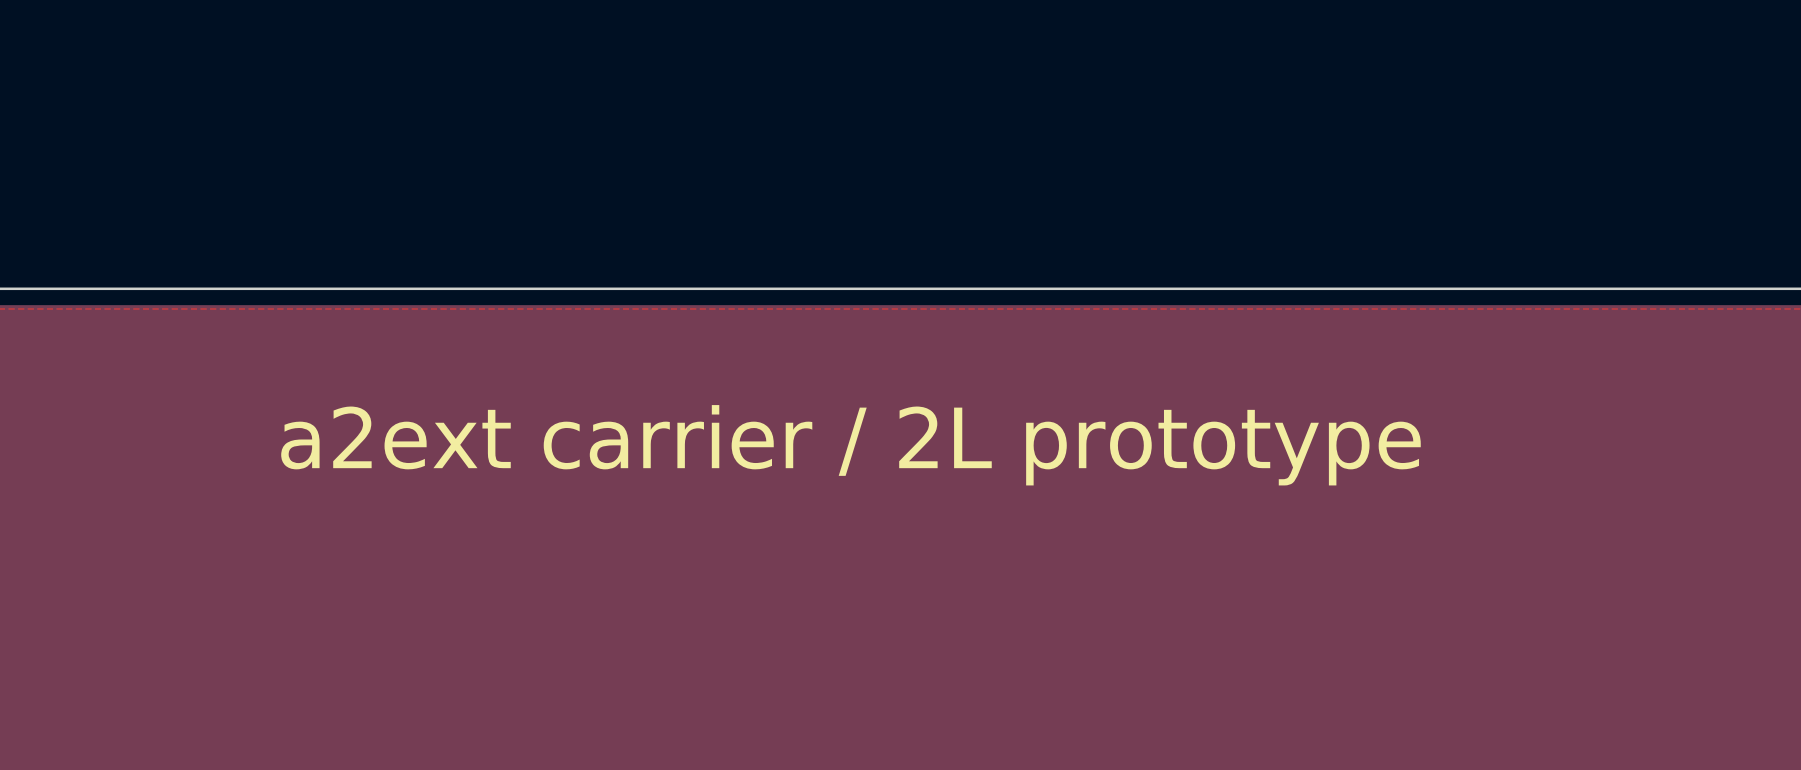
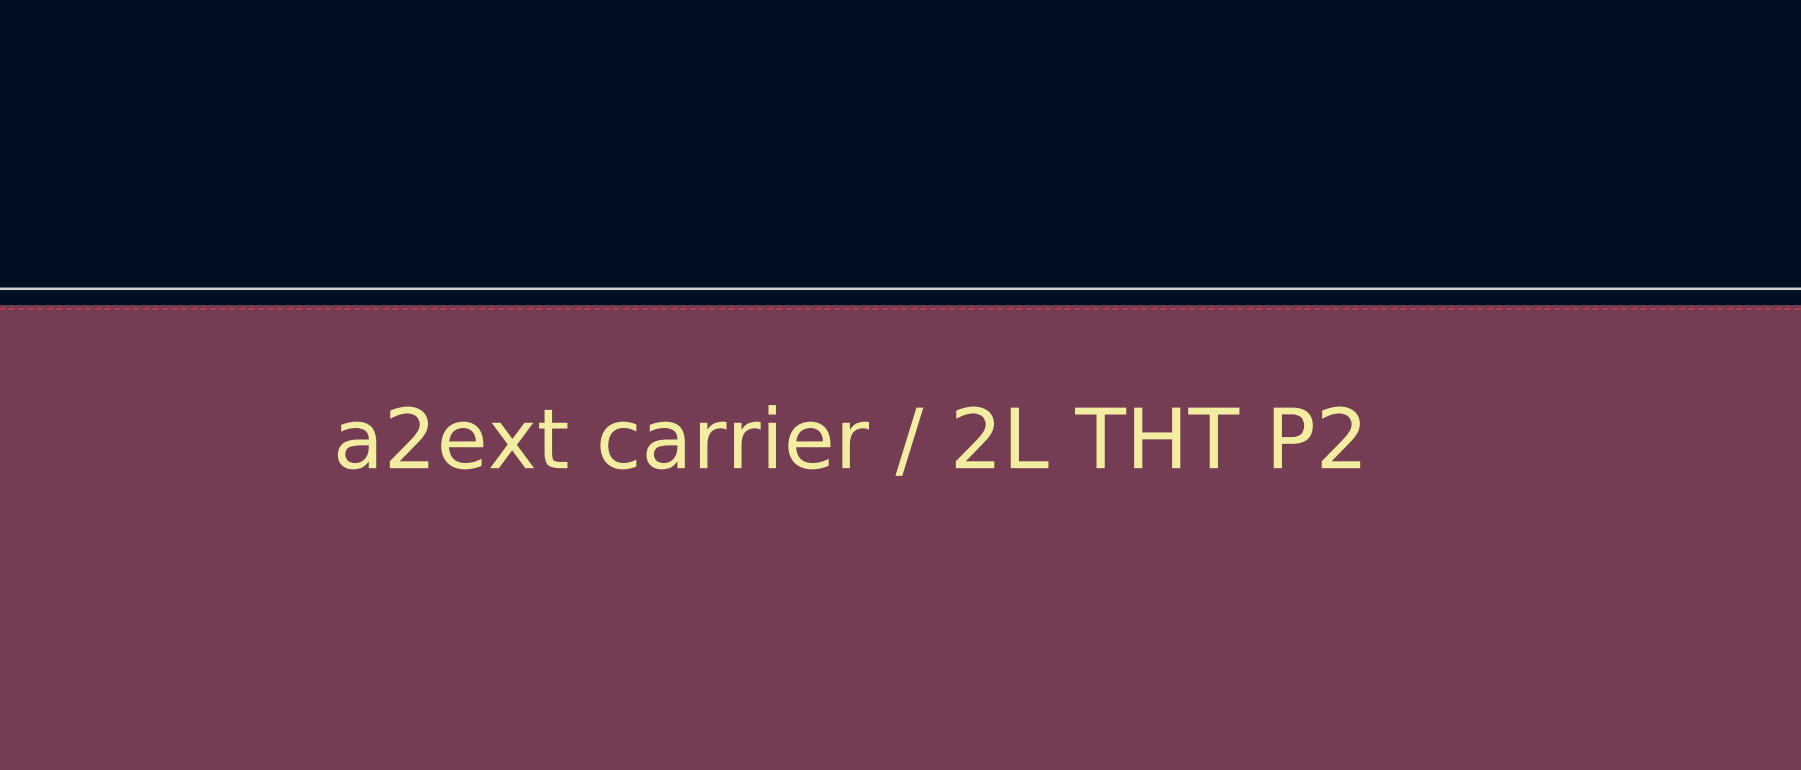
text: a2ext carrier / 2L prototype (850, 445) -> a2ext carrier / 2L THT P2 (849, 440)

